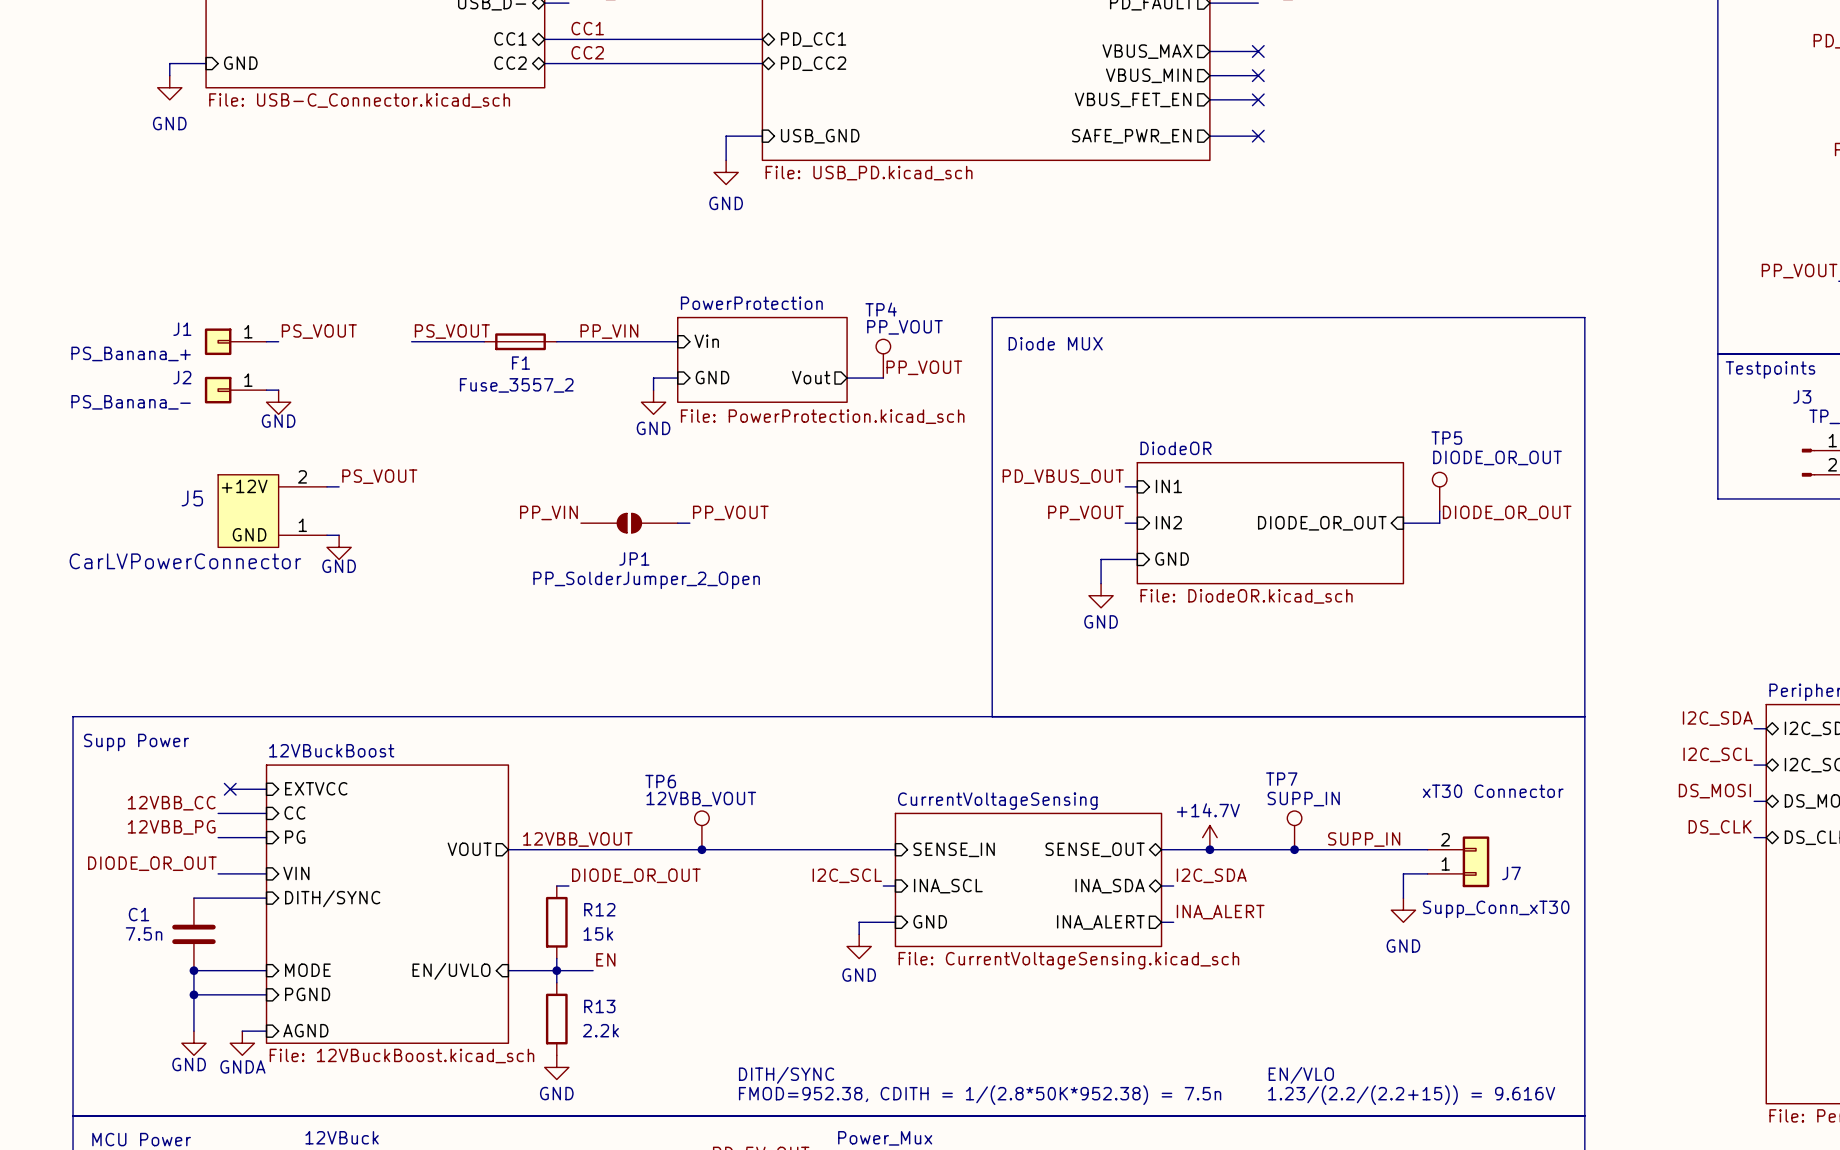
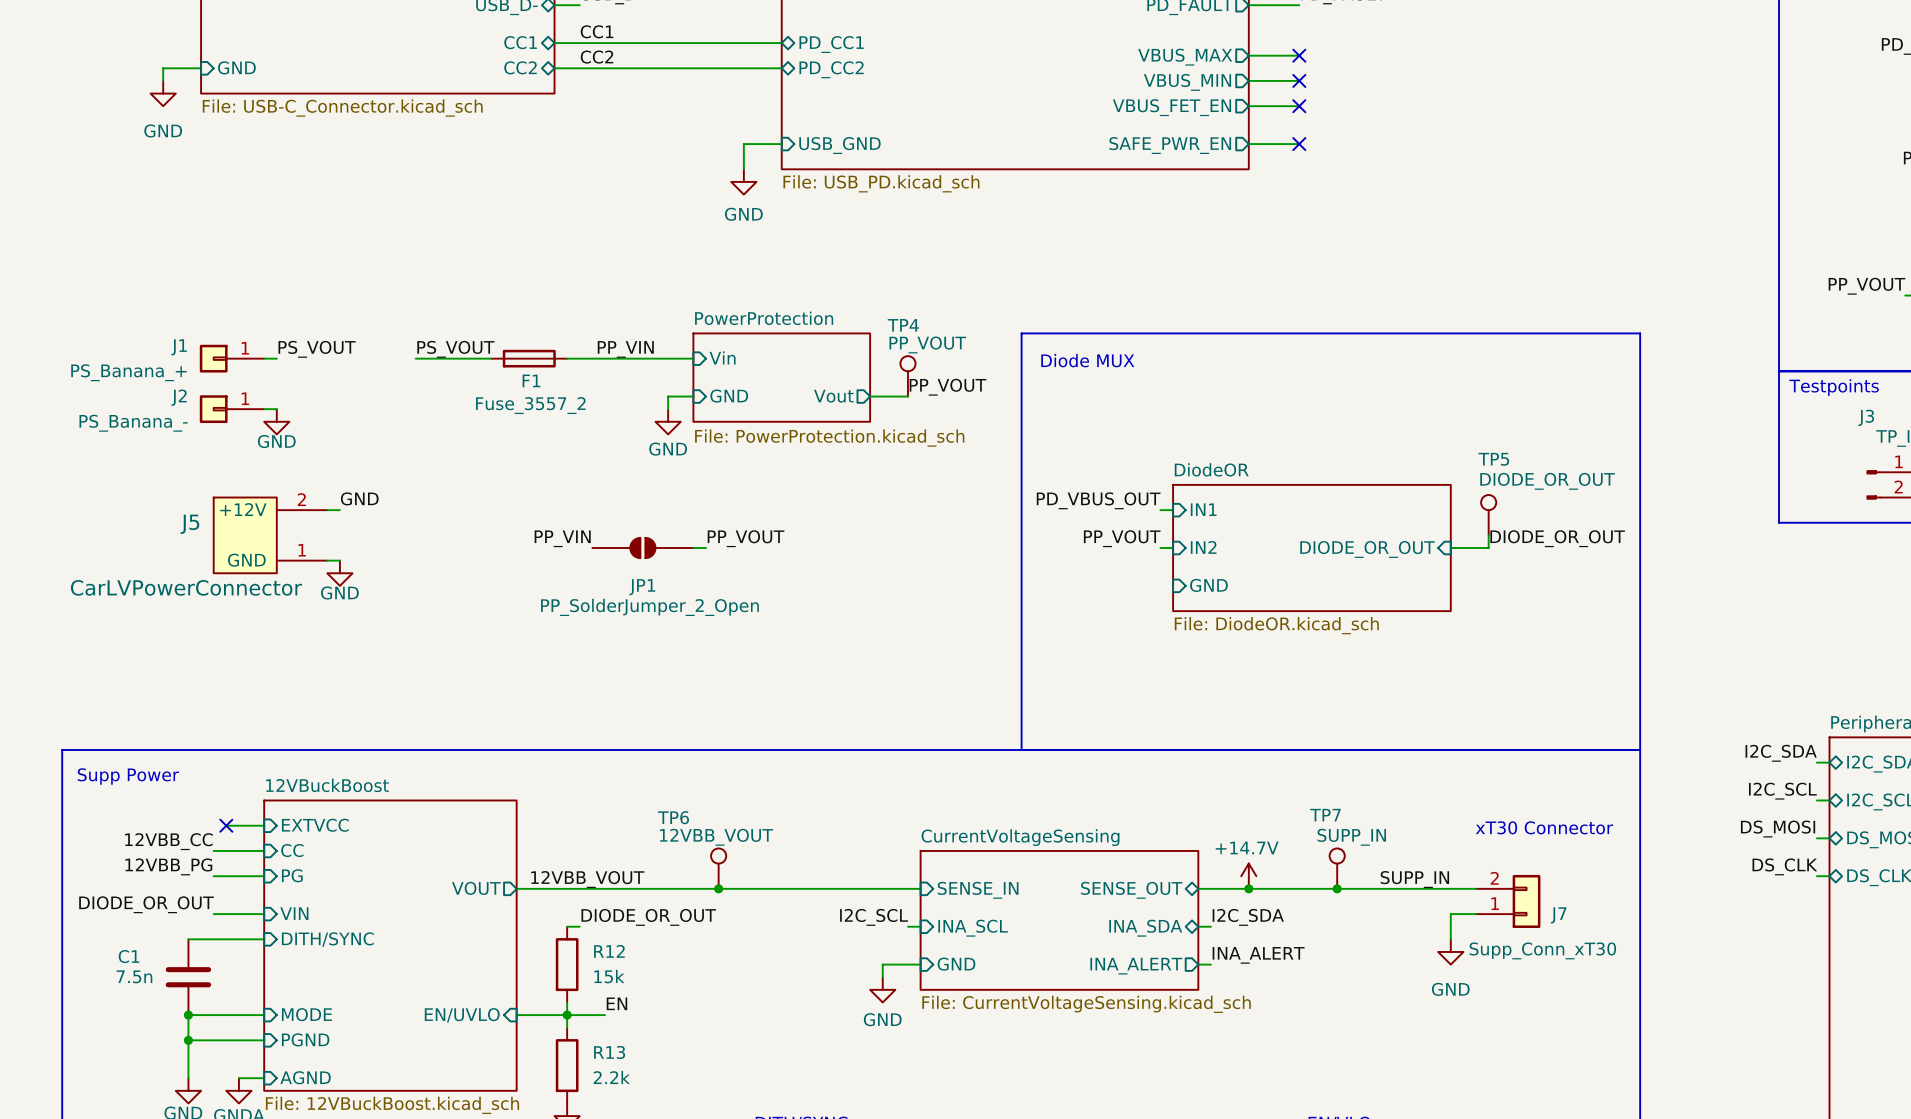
label: PS_VOUT (379, 476) -> GND (359, 498)
wire: (1137, 559) (1101, 559) (1101, 583) -> none
power symbol: GND (1101, 595) -> none

